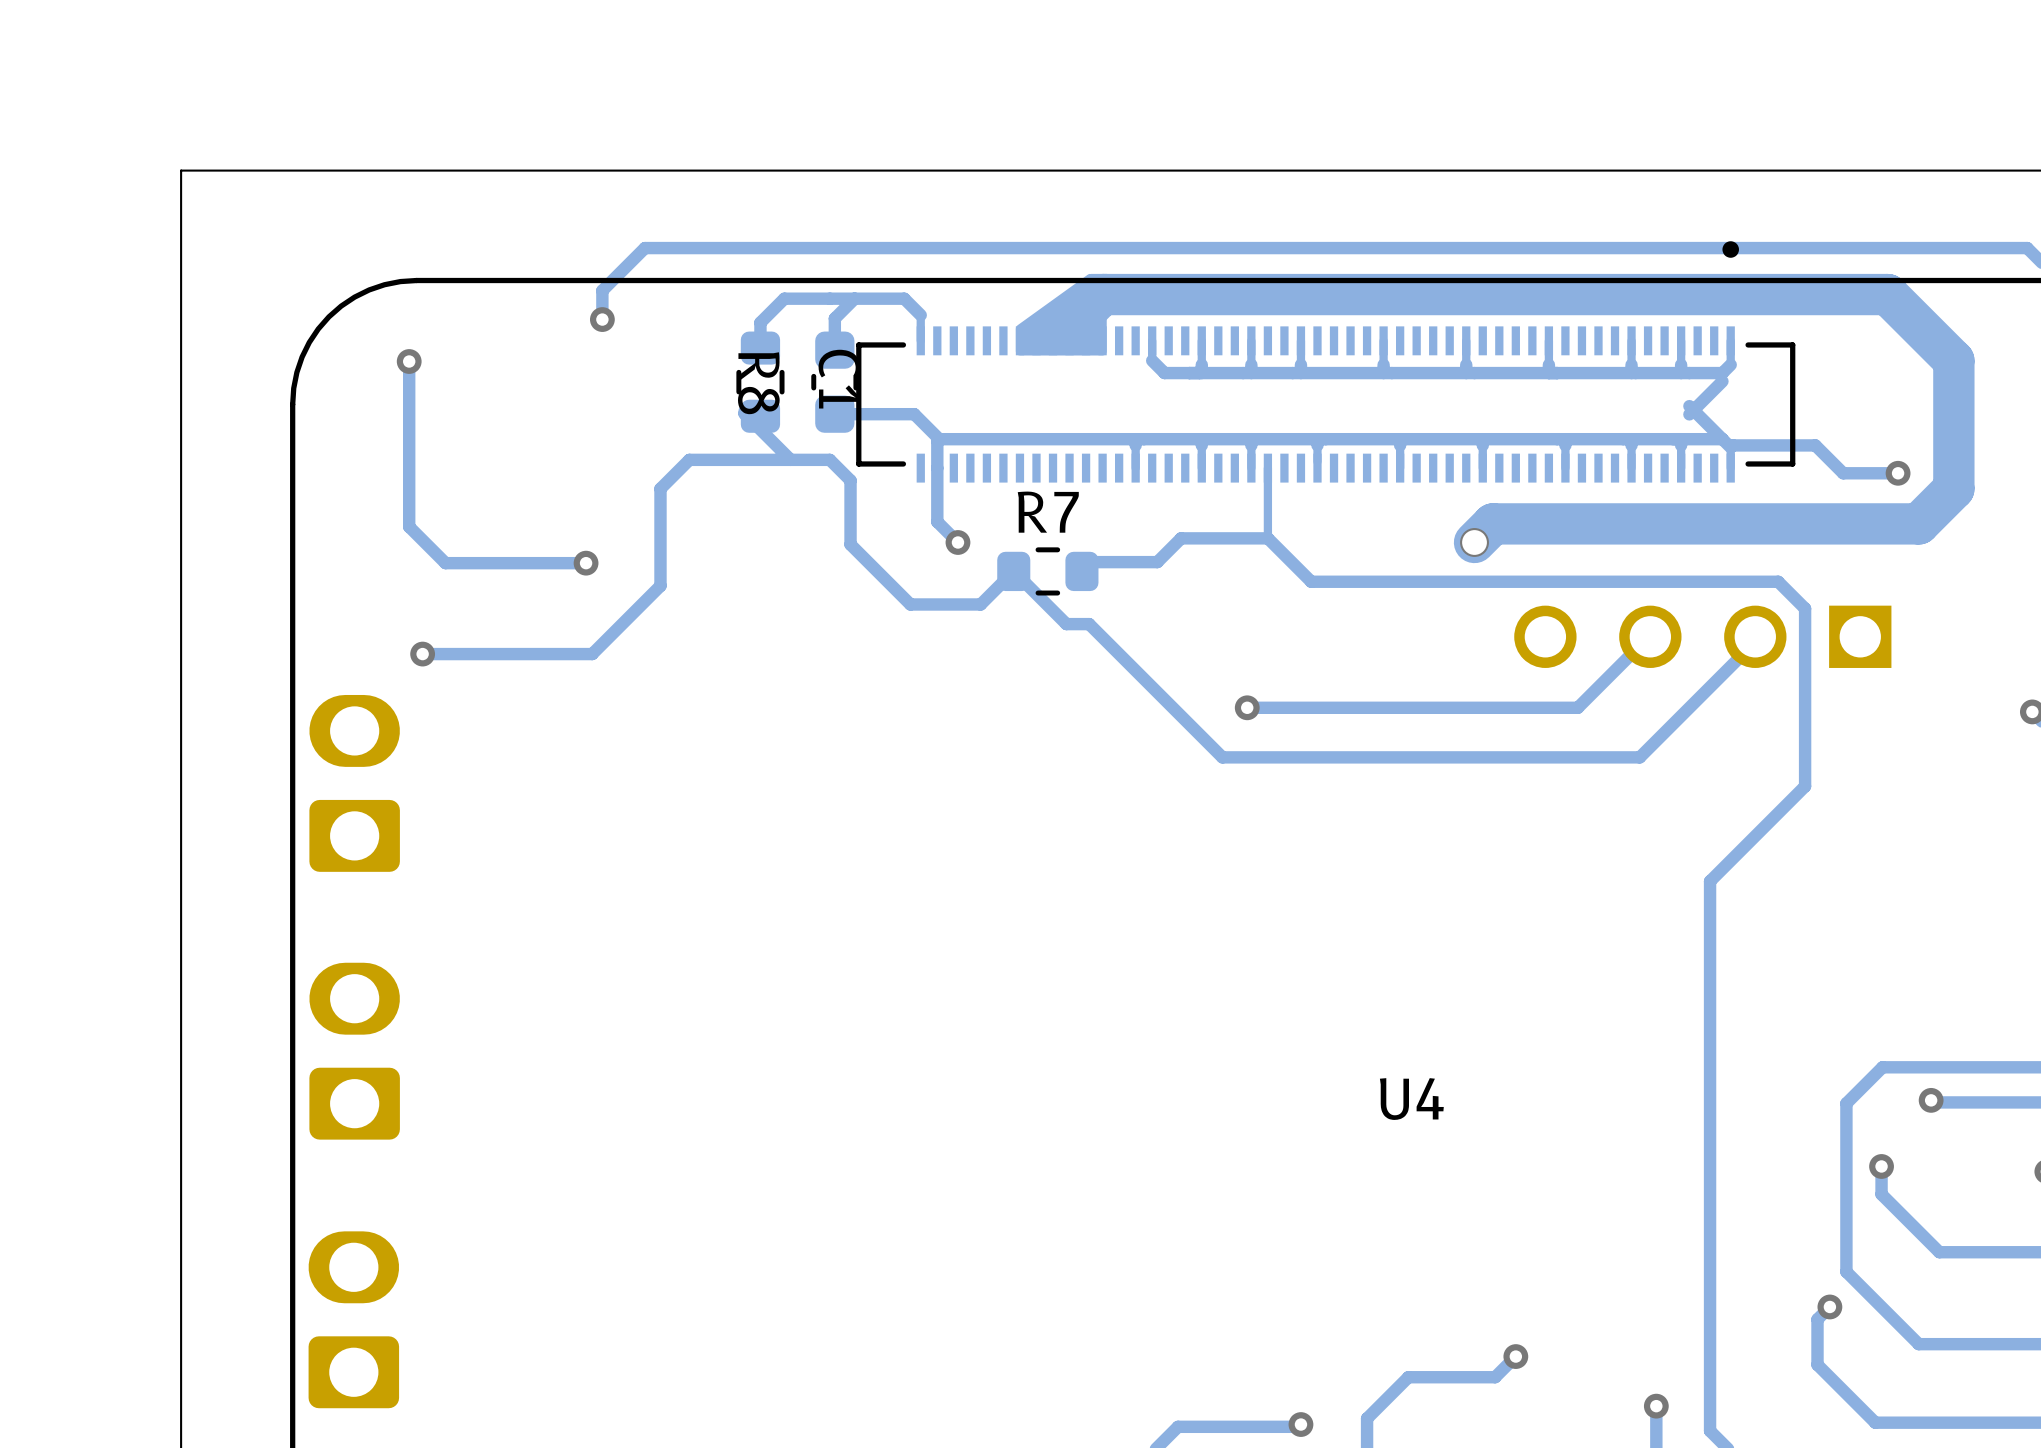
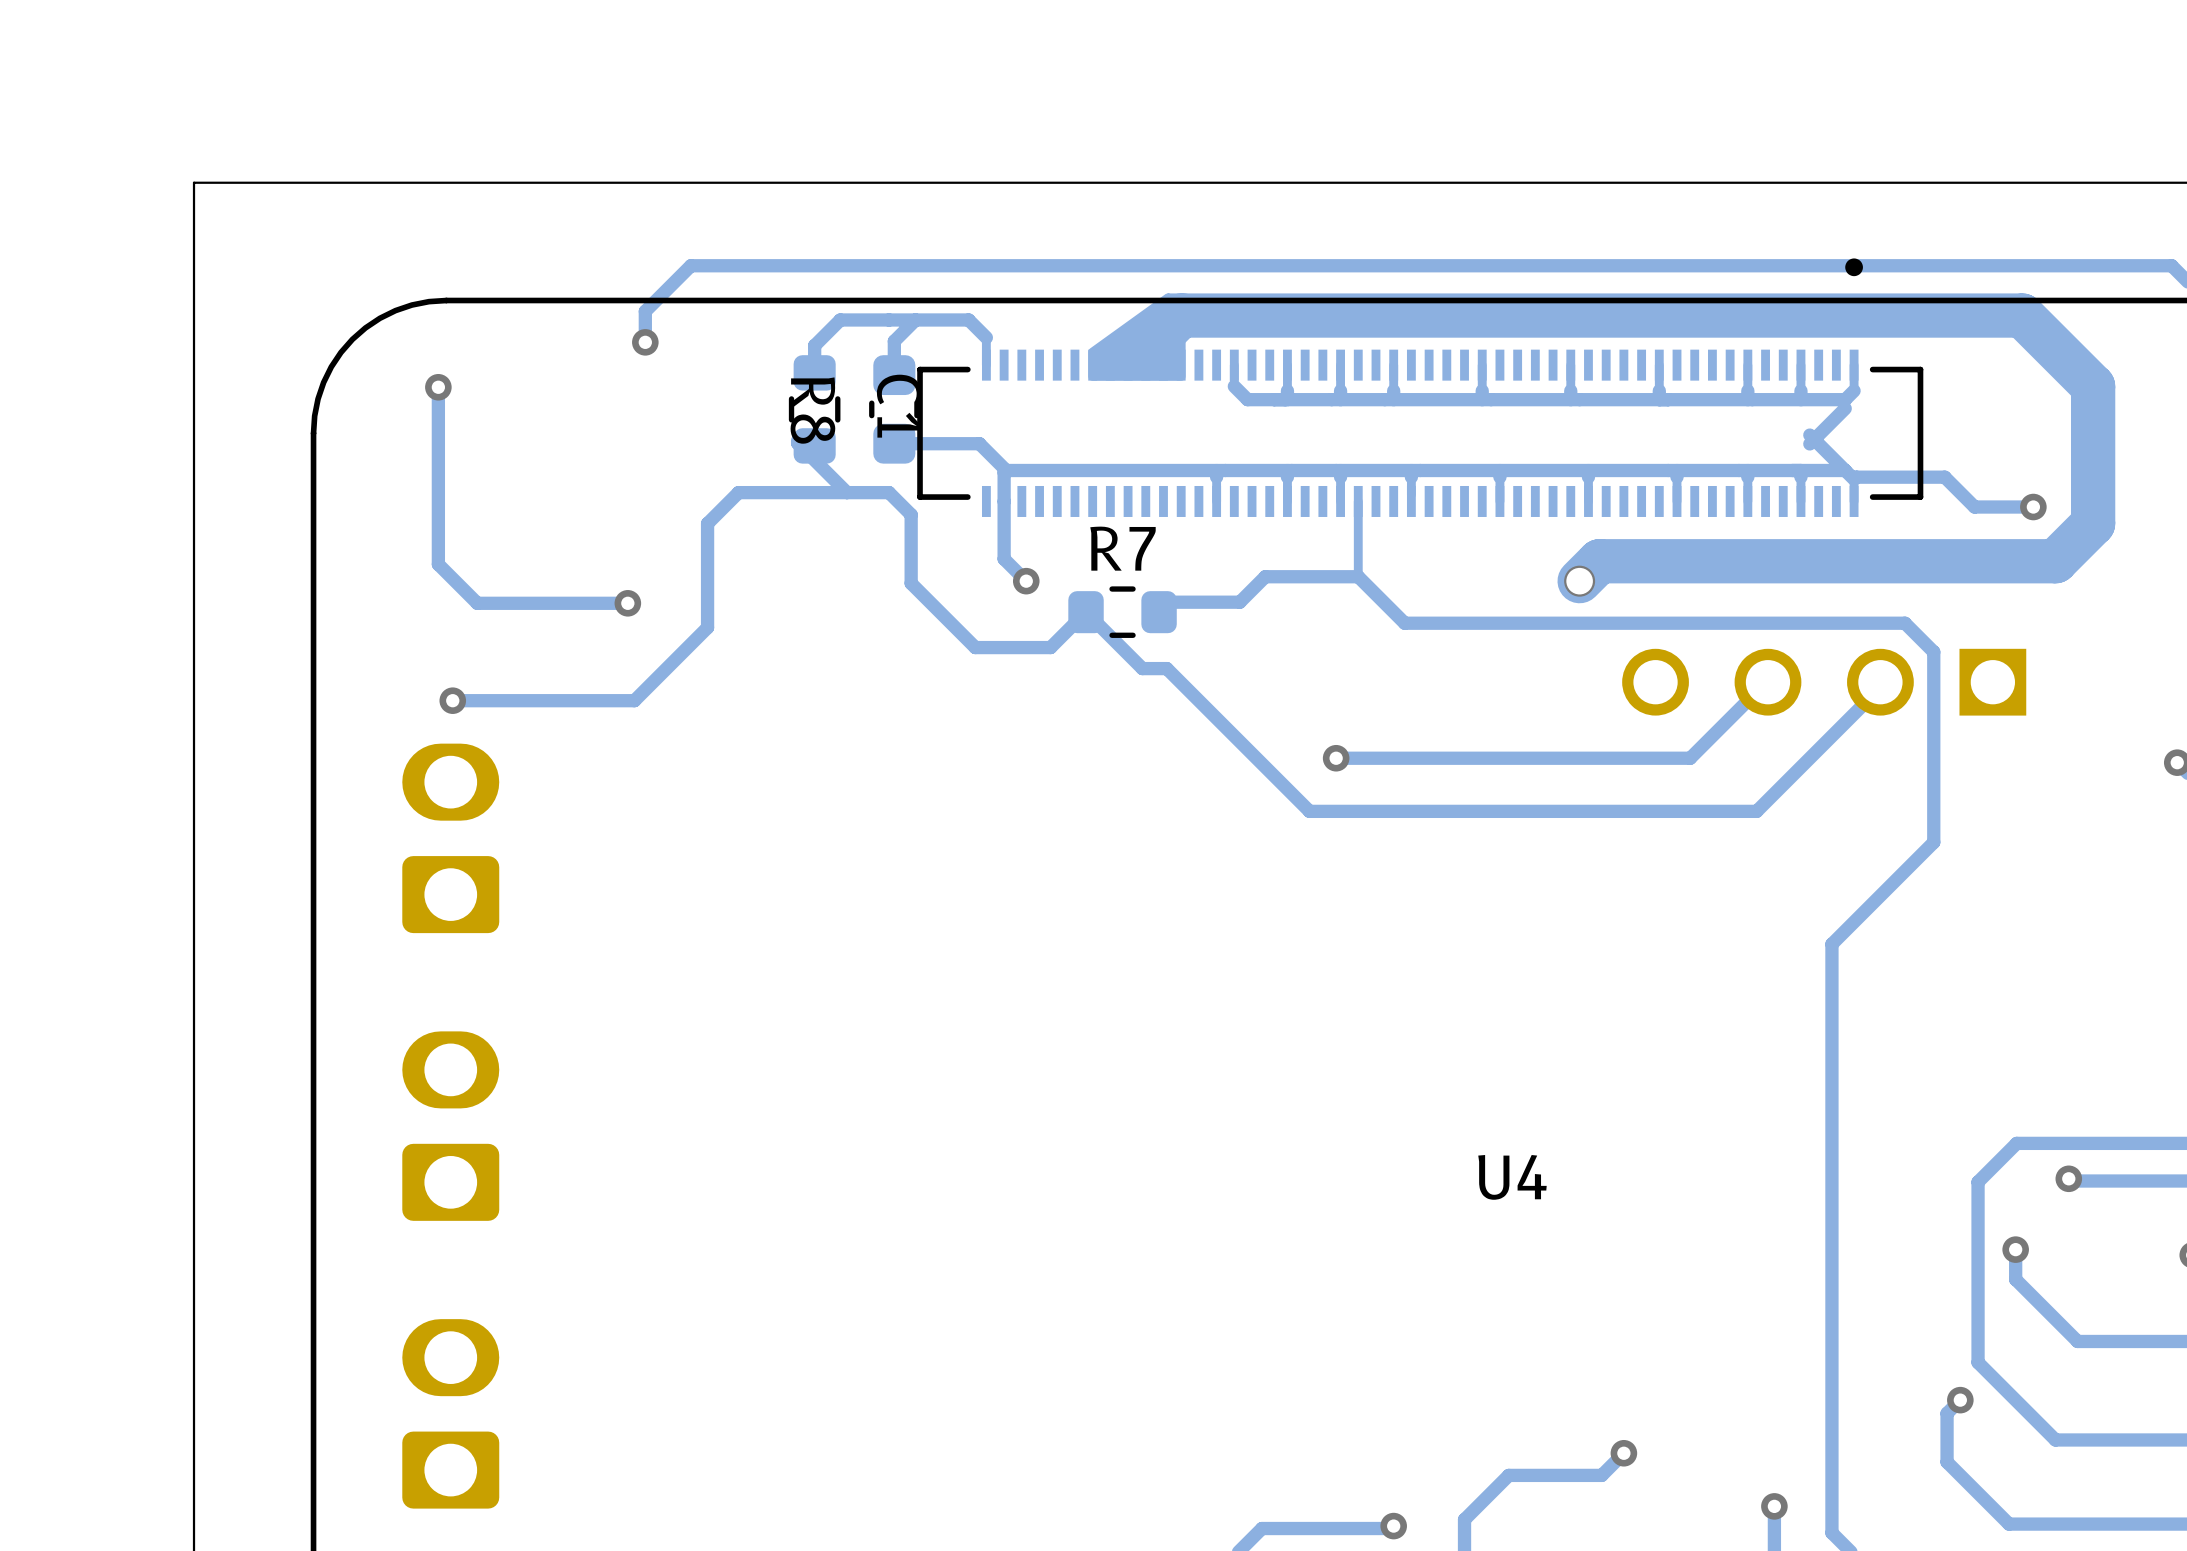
part position: (354, 783) -> (450, 838)
part position: (354, 1051) -> (450, 1126)
part position: (353, 1319) -> (450, 1413)

